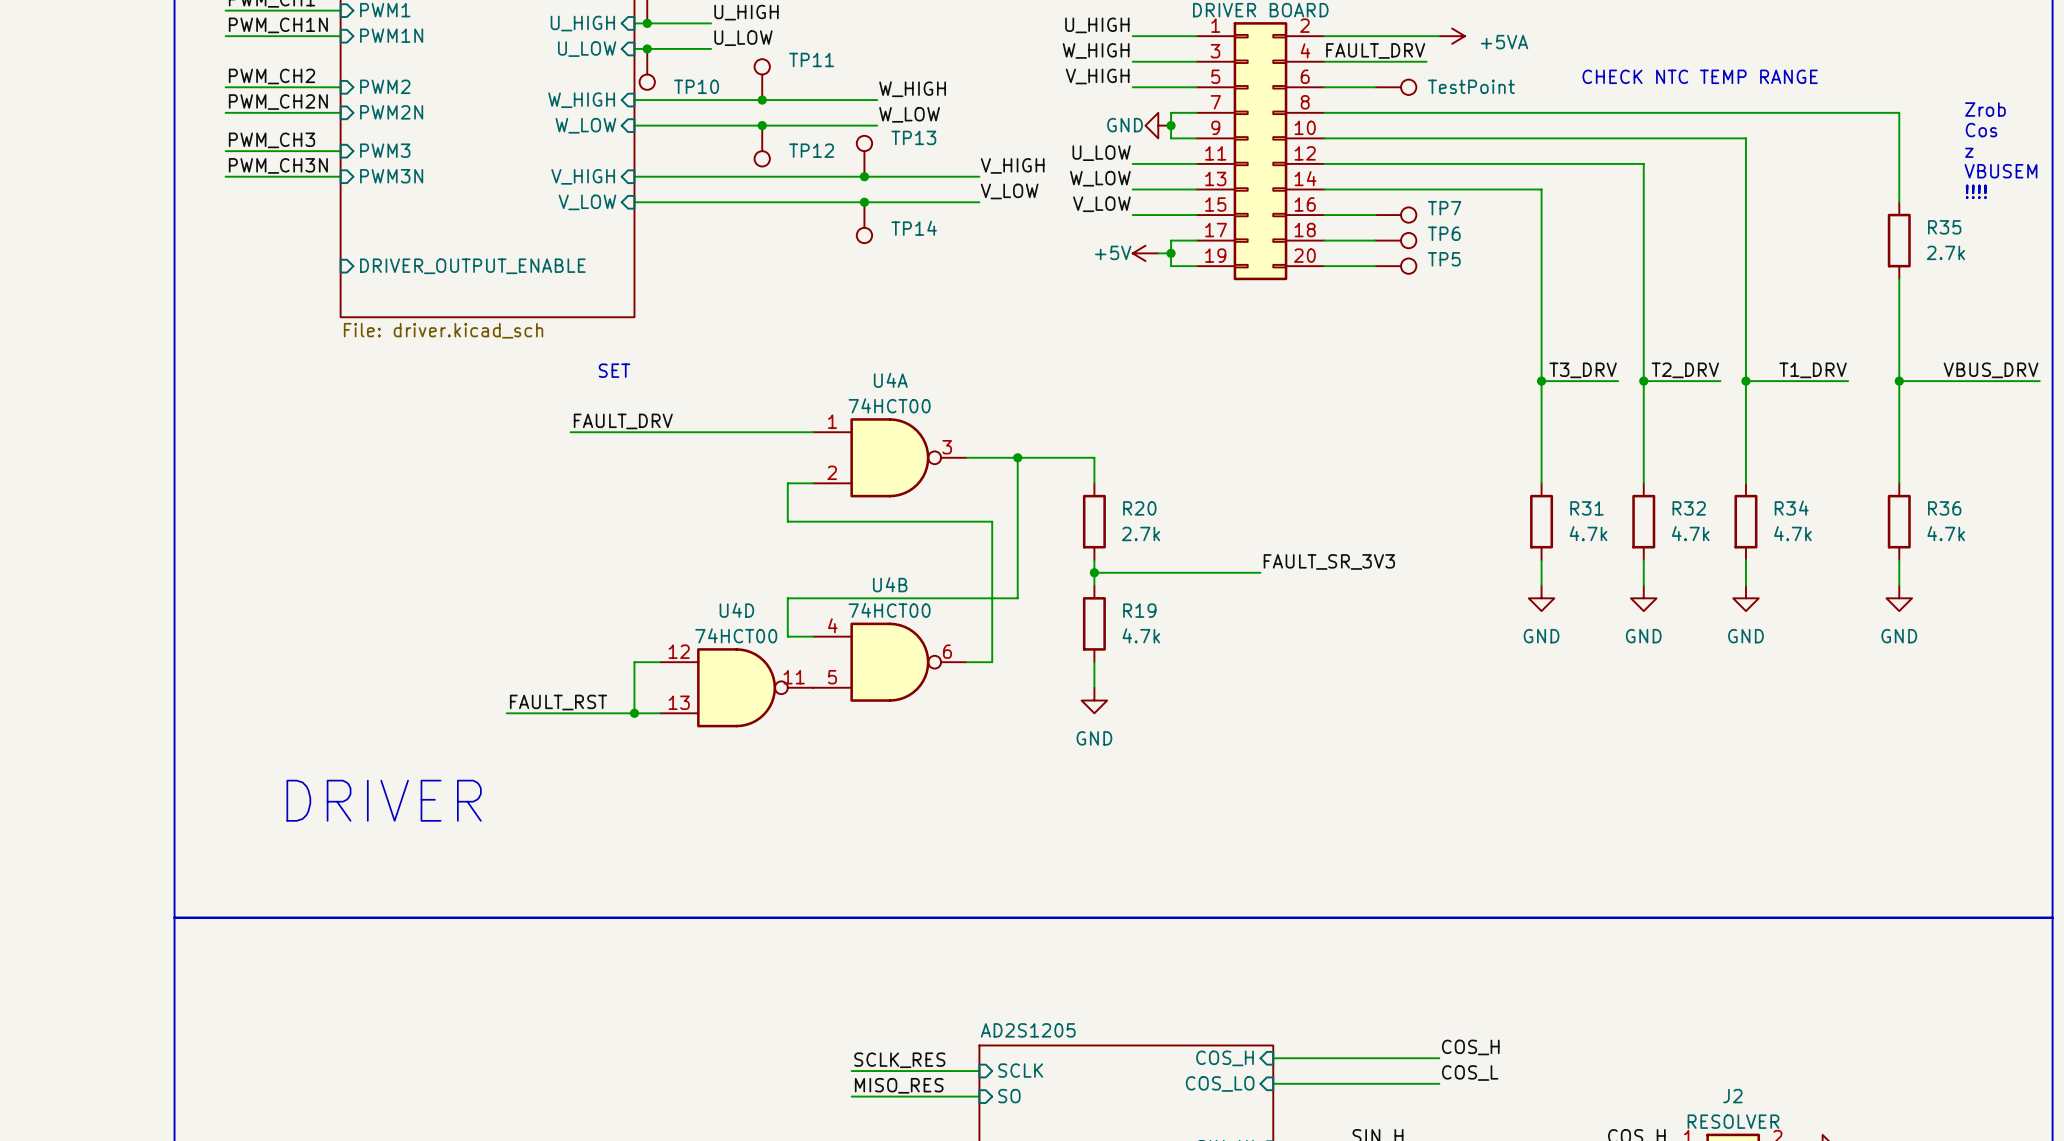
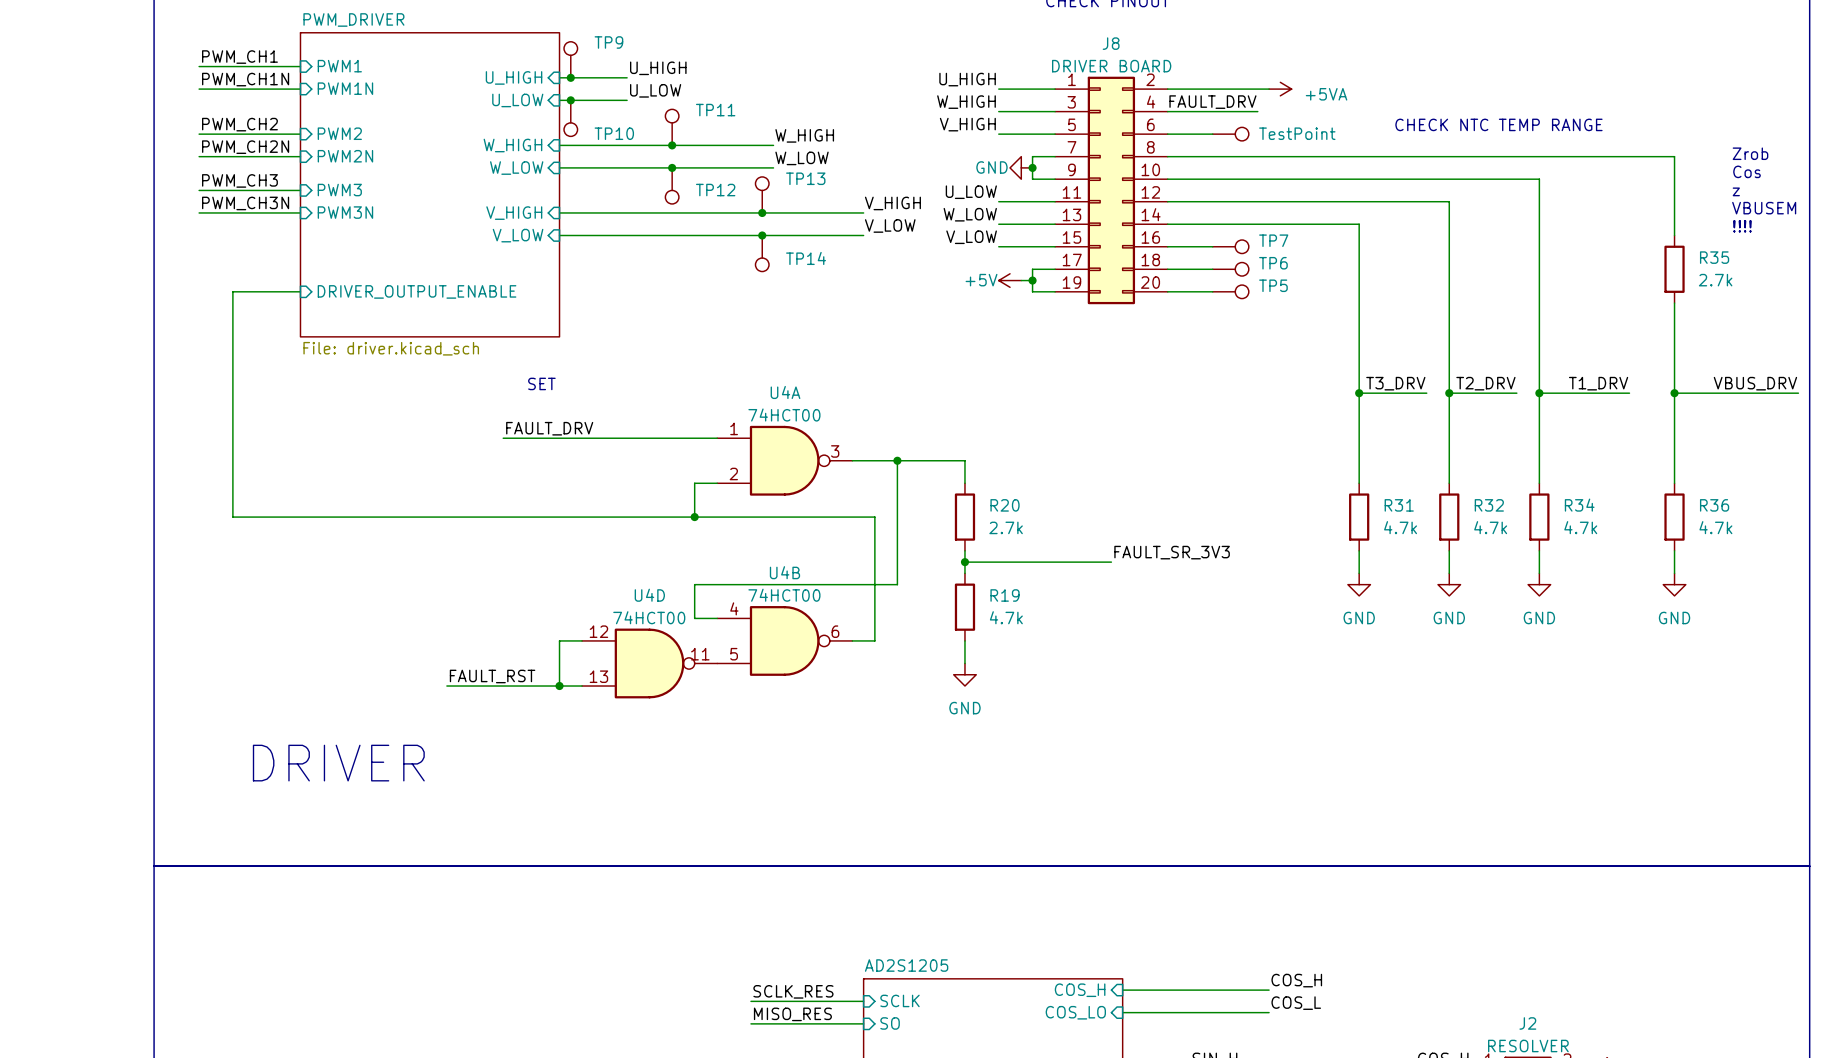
wire: none -> (300, 291) (232, 291) (232, 517) (694, 517)
junction: none -> (694, 517)

